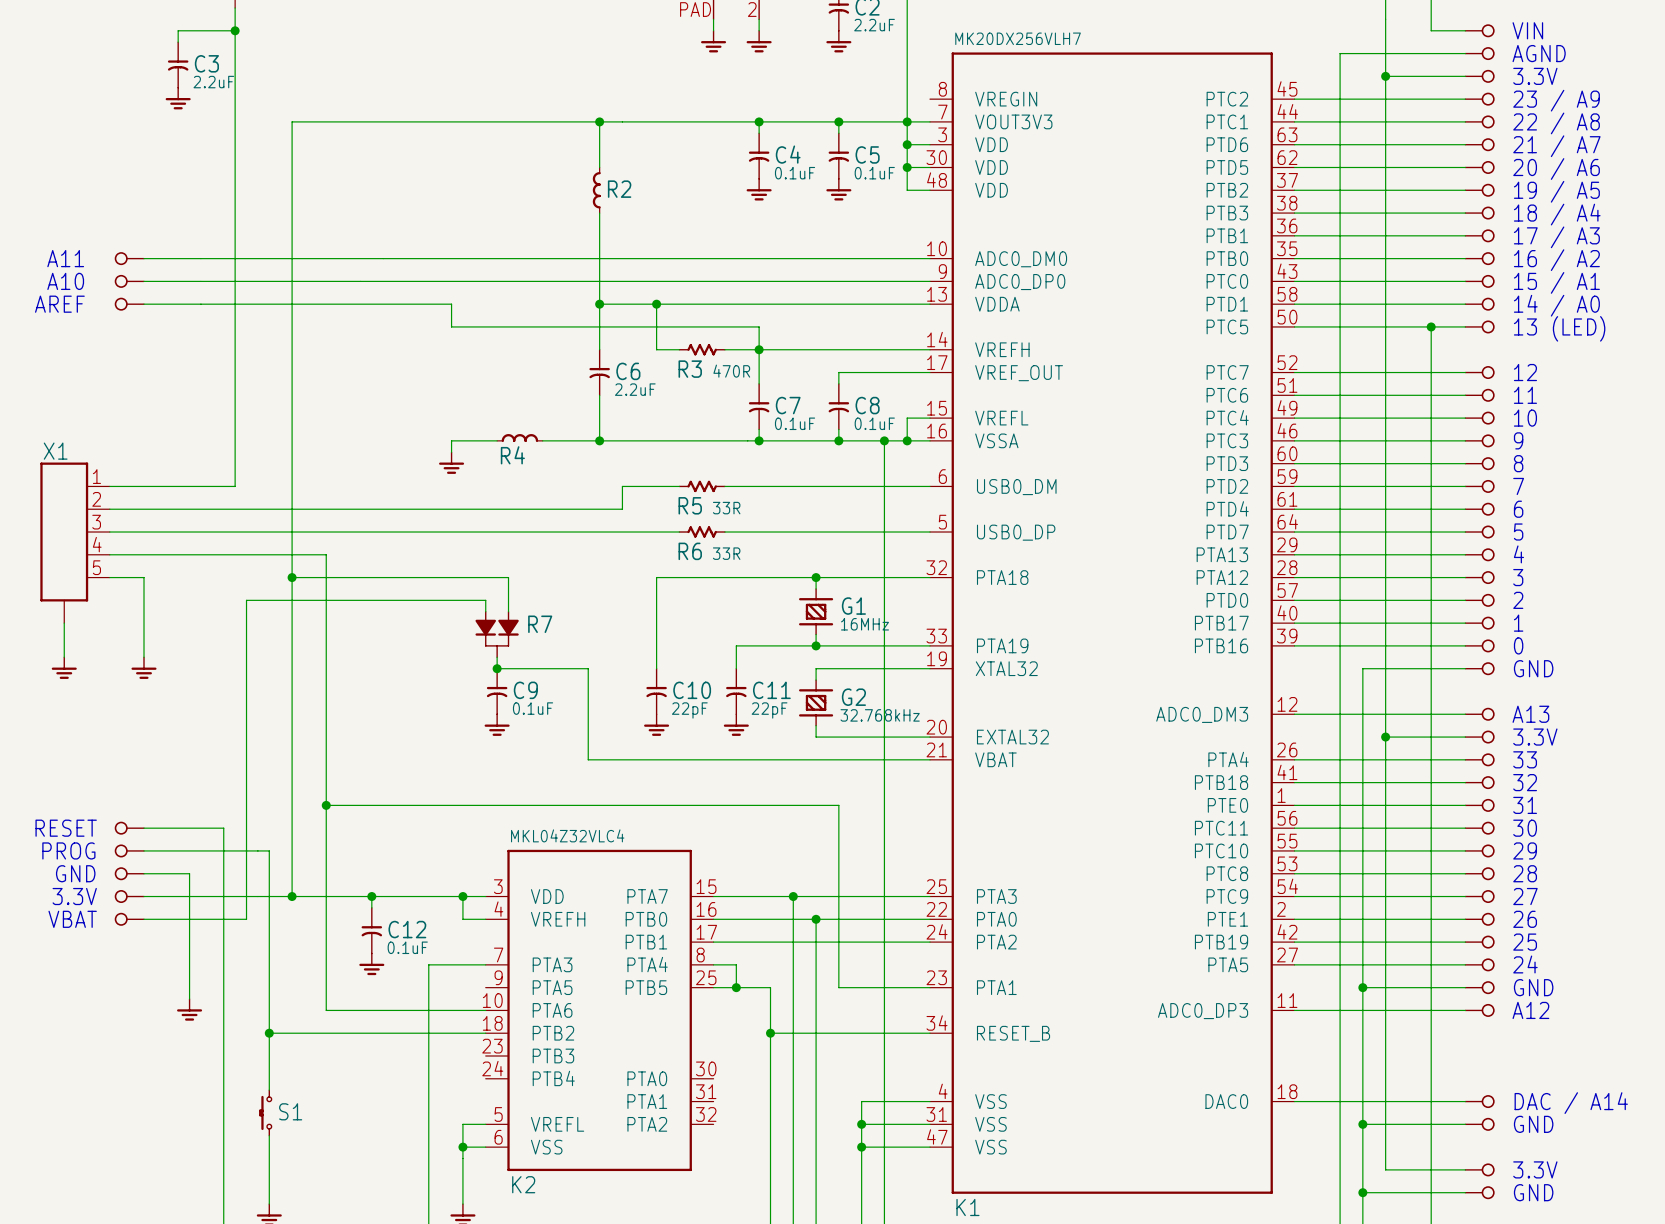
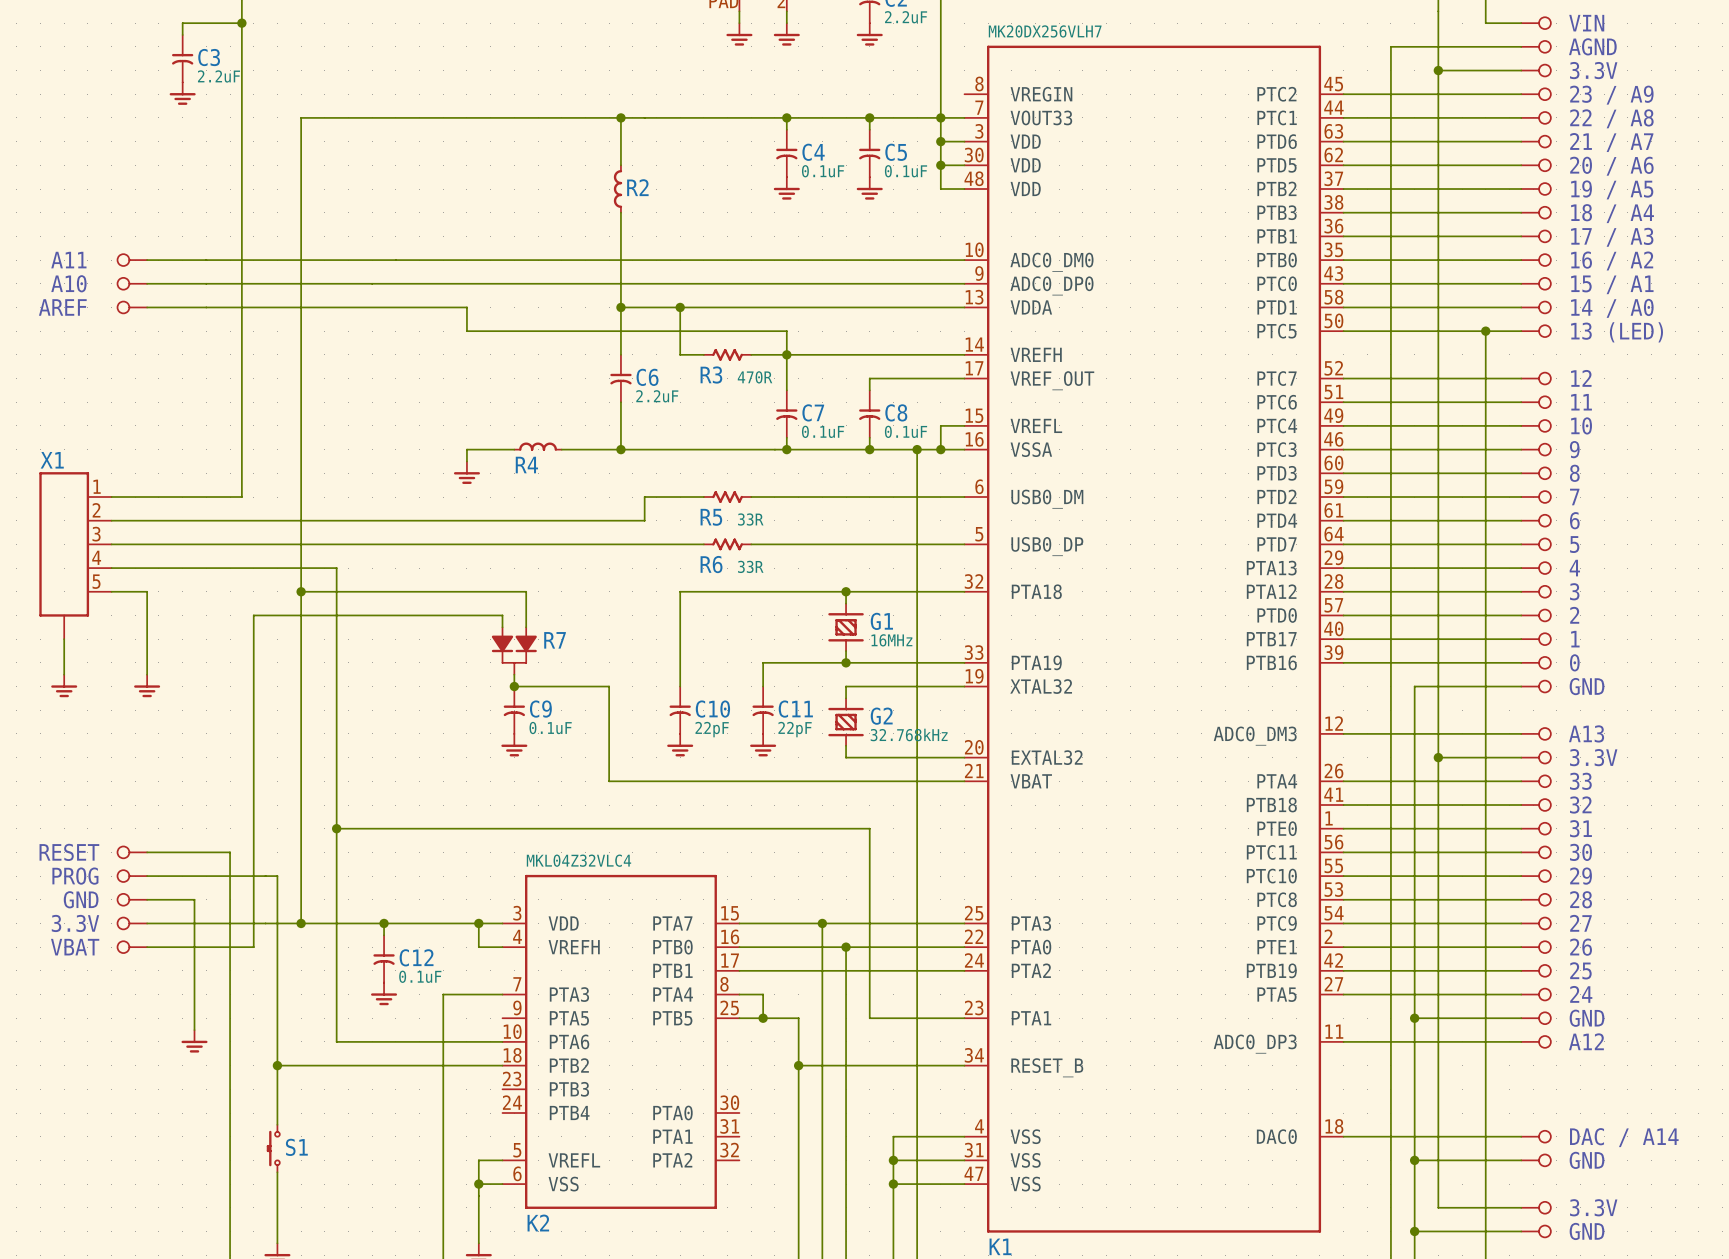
K1 pin name: VOUT3V3 (1013, 121) -> VOUT33 (1041, 117)

